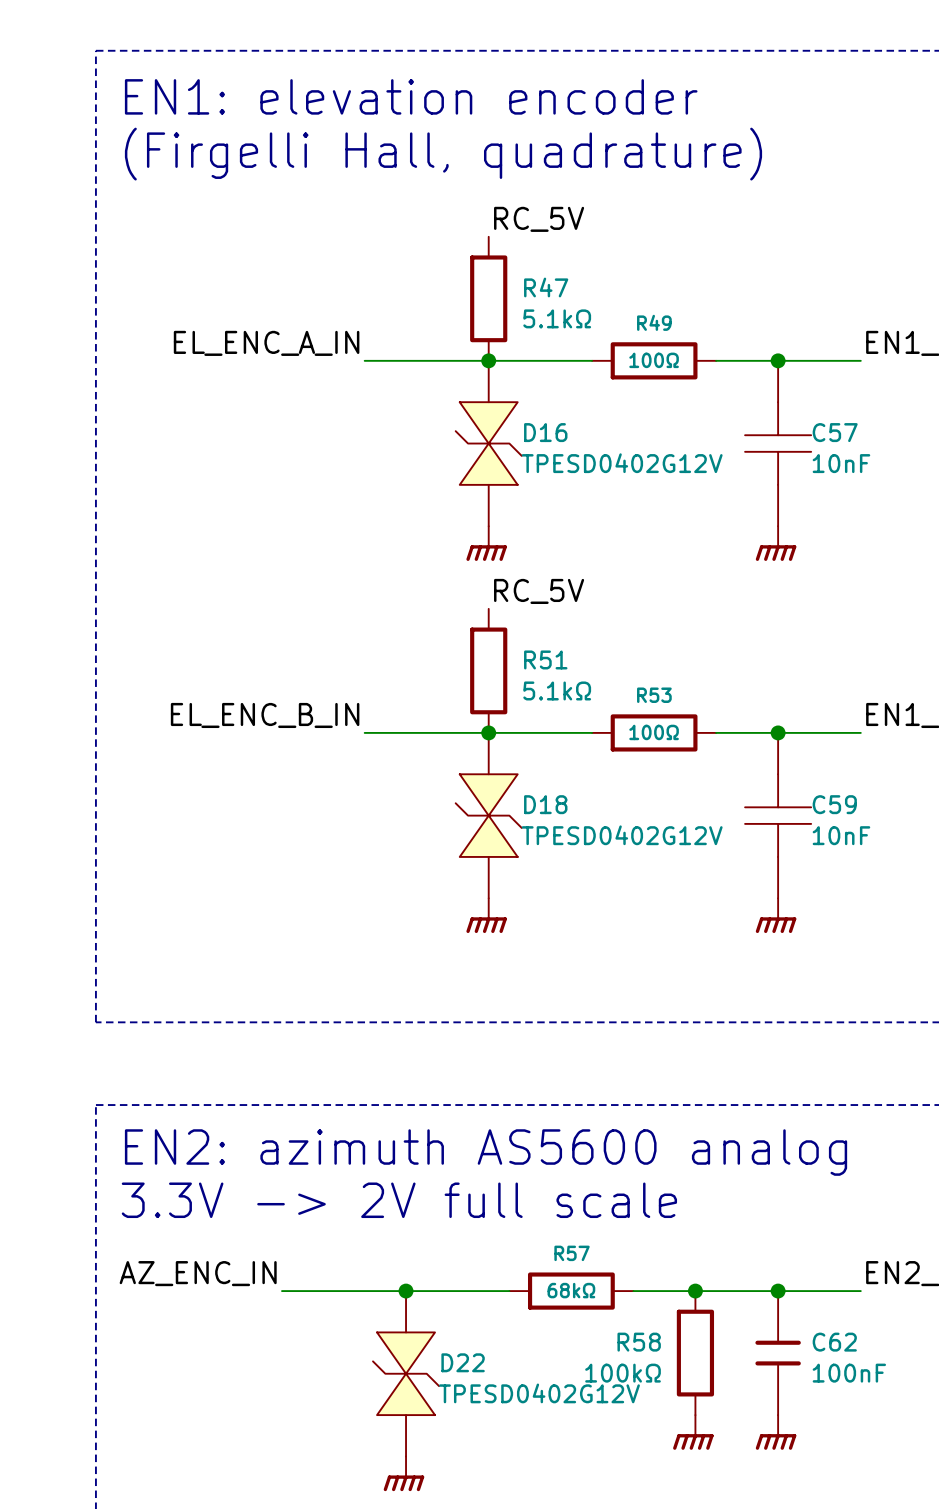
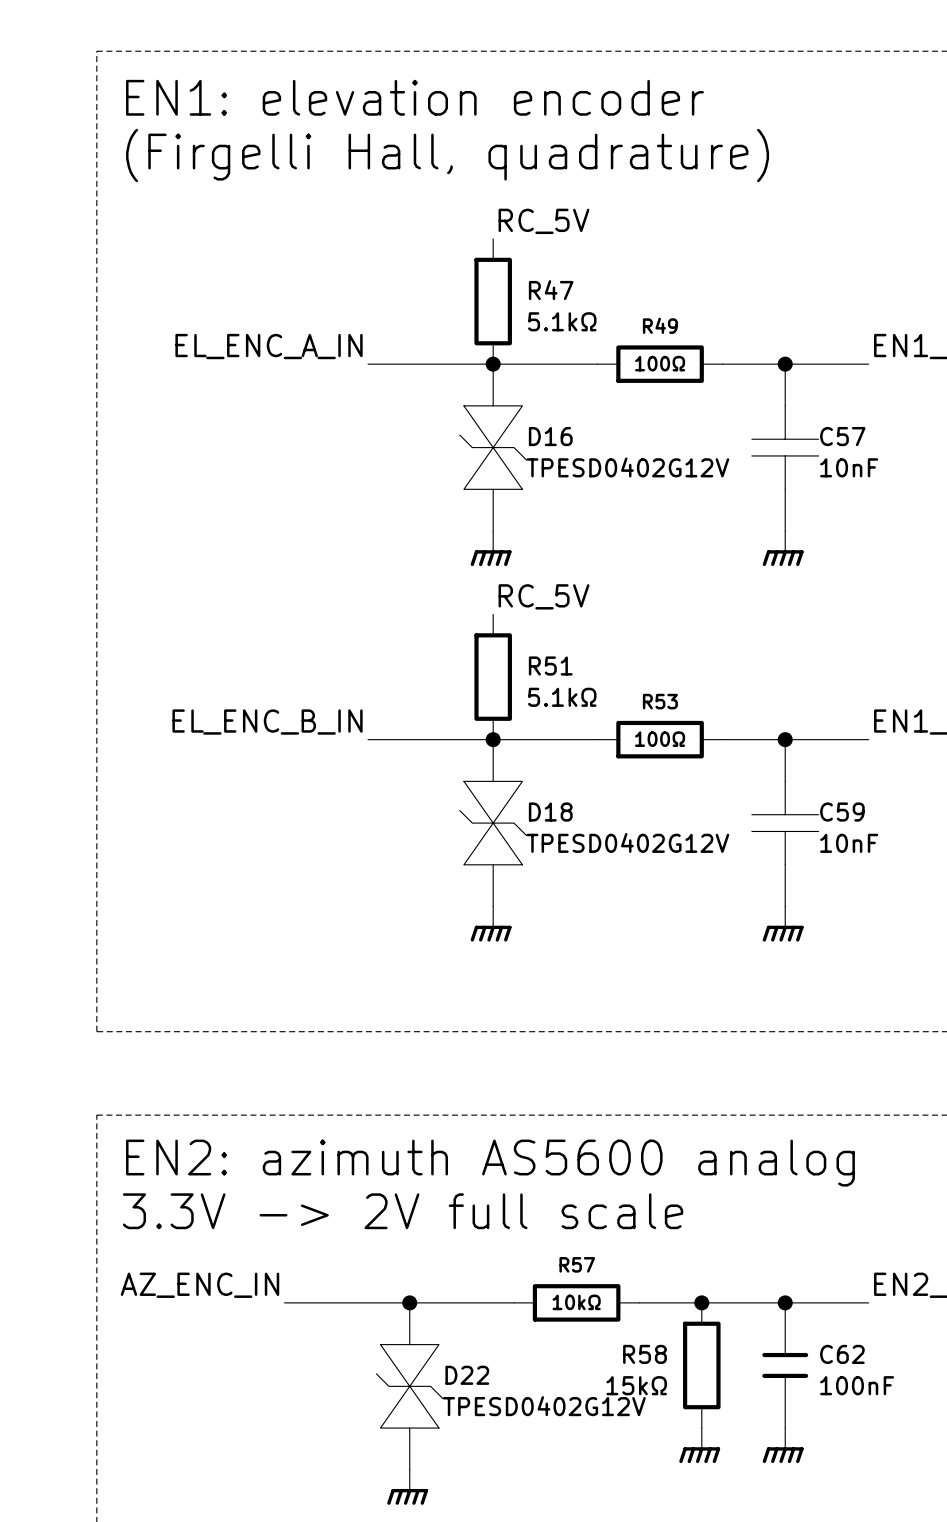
R57 value: 68kΩ (571, 1290) -> 10kΩ (576, 1302)
R58 value: 100kΩ (623, 1373) -> 15kΩ (636, 1385)

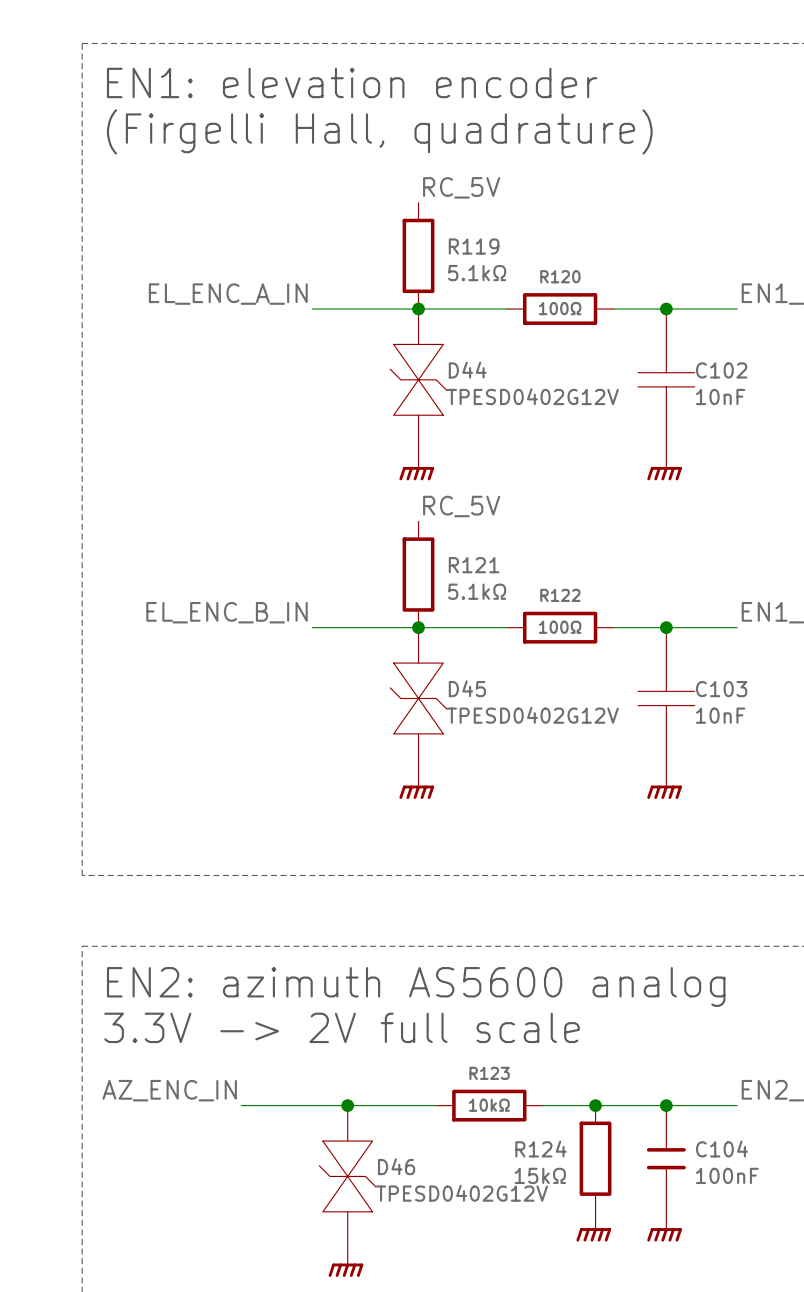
R47 name: R47 (551, 290) -> R119 (474, 246)
R49 name: R49 (660, 325) -> R120 (560, 276)
D16 name: D16 (550, 436) -> D44 (467, 370)
C57 name: C57 (842, 436) -> C102 (721, 370)
R51 name: R51 (550, 666) -> R121 (474, 565)
R53 name: R53 (660, 701) -> R122 (560, 595)
D18 name: D18 (550, 812) -> D45 (467, 688)
C59 name: C59 (842, 812) -> C103 (721, 689)
R57 name: R57 (577, 1264) -> R123 (489, 1073)
R58 name: R58 (645, 1354) -> R124 (540, 1149)
C62 name: C62 (842, 1354) -> C104 (721, 1149)
D22 name: D22 (467, 1375) -> D46 (396, 1166)

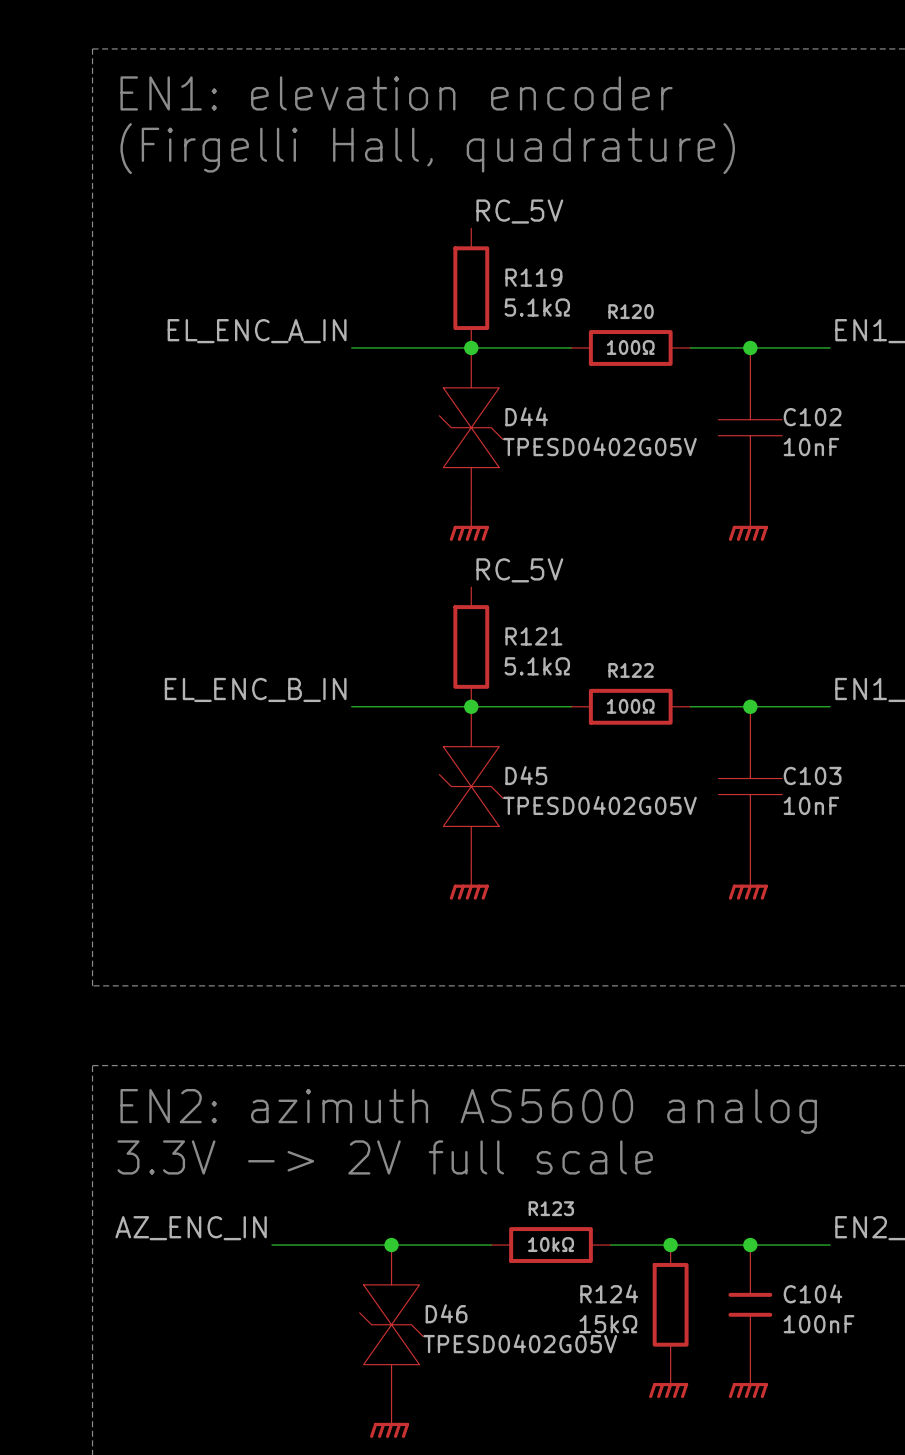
D44 value: TPESD0402G12V (532, 396) -> TPESD0402G05V (599, 446)
D45 value: TPESD0402G12V (532, 715) -> TPESD0402G05V (599, 805)
D46 value: TPESD0402G12V (461, 1193) -> TPESD0402G05V (520, 1343)

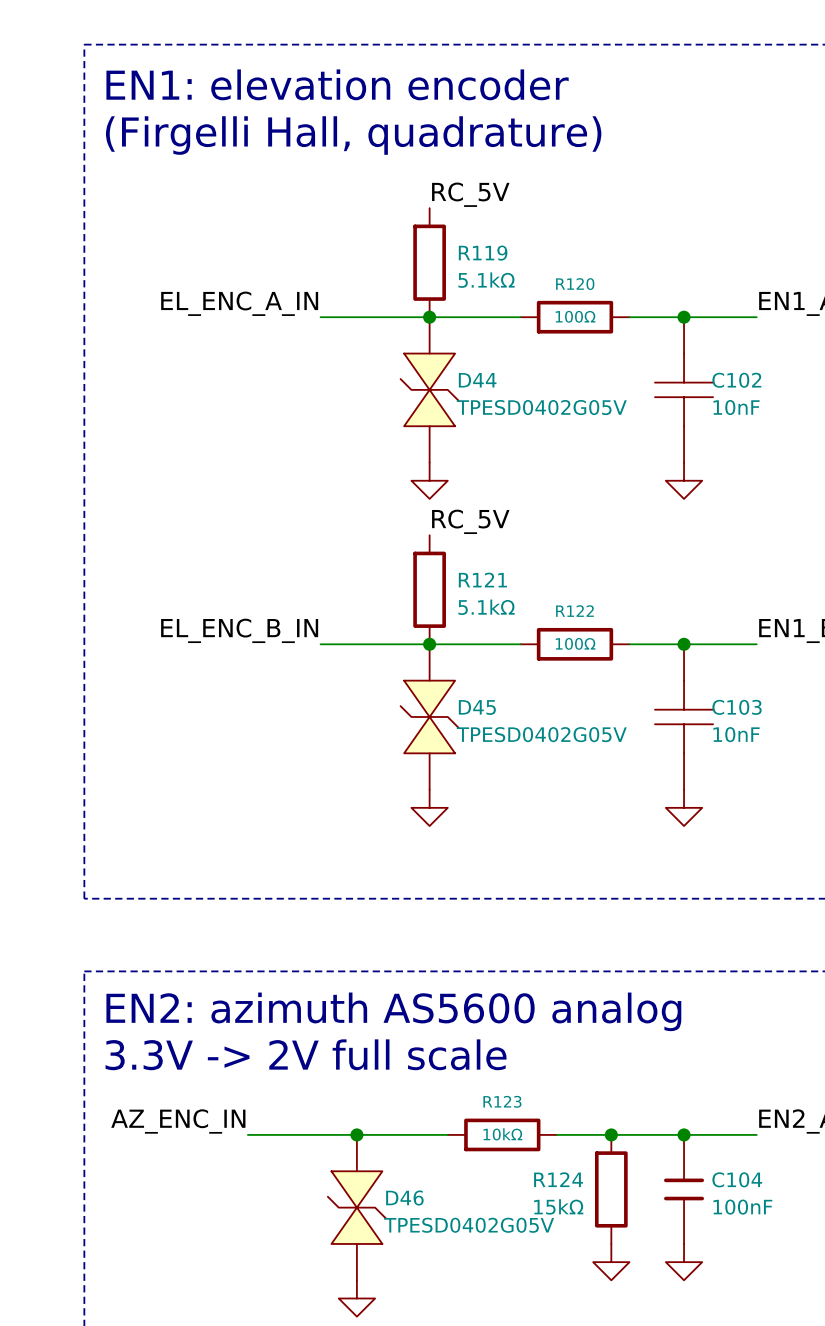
power symbol shape: [449, 507, 489, 541] -> [411, 462, 448, 499]
power symbol shape: [728, 507, 768, 541] -> [665, 462, 703, 499]
power symbol shape: [449, 866, 489, 900] -> [411, 789, 448, 827]
power symbol shape: [728, 866, 768, 900] -> [665, 789, 703, 827]
power symbol shape: [649, 1364, 689, 1399] -> [593, 1243, 630, 1281]
power symbol shape: [728, 1364, 768, 1399] -> [665, 1243, 703, 1281]
power symbol shape: [370, 1404, 410, 1438] -> [338, 1280, 376, 1317]

